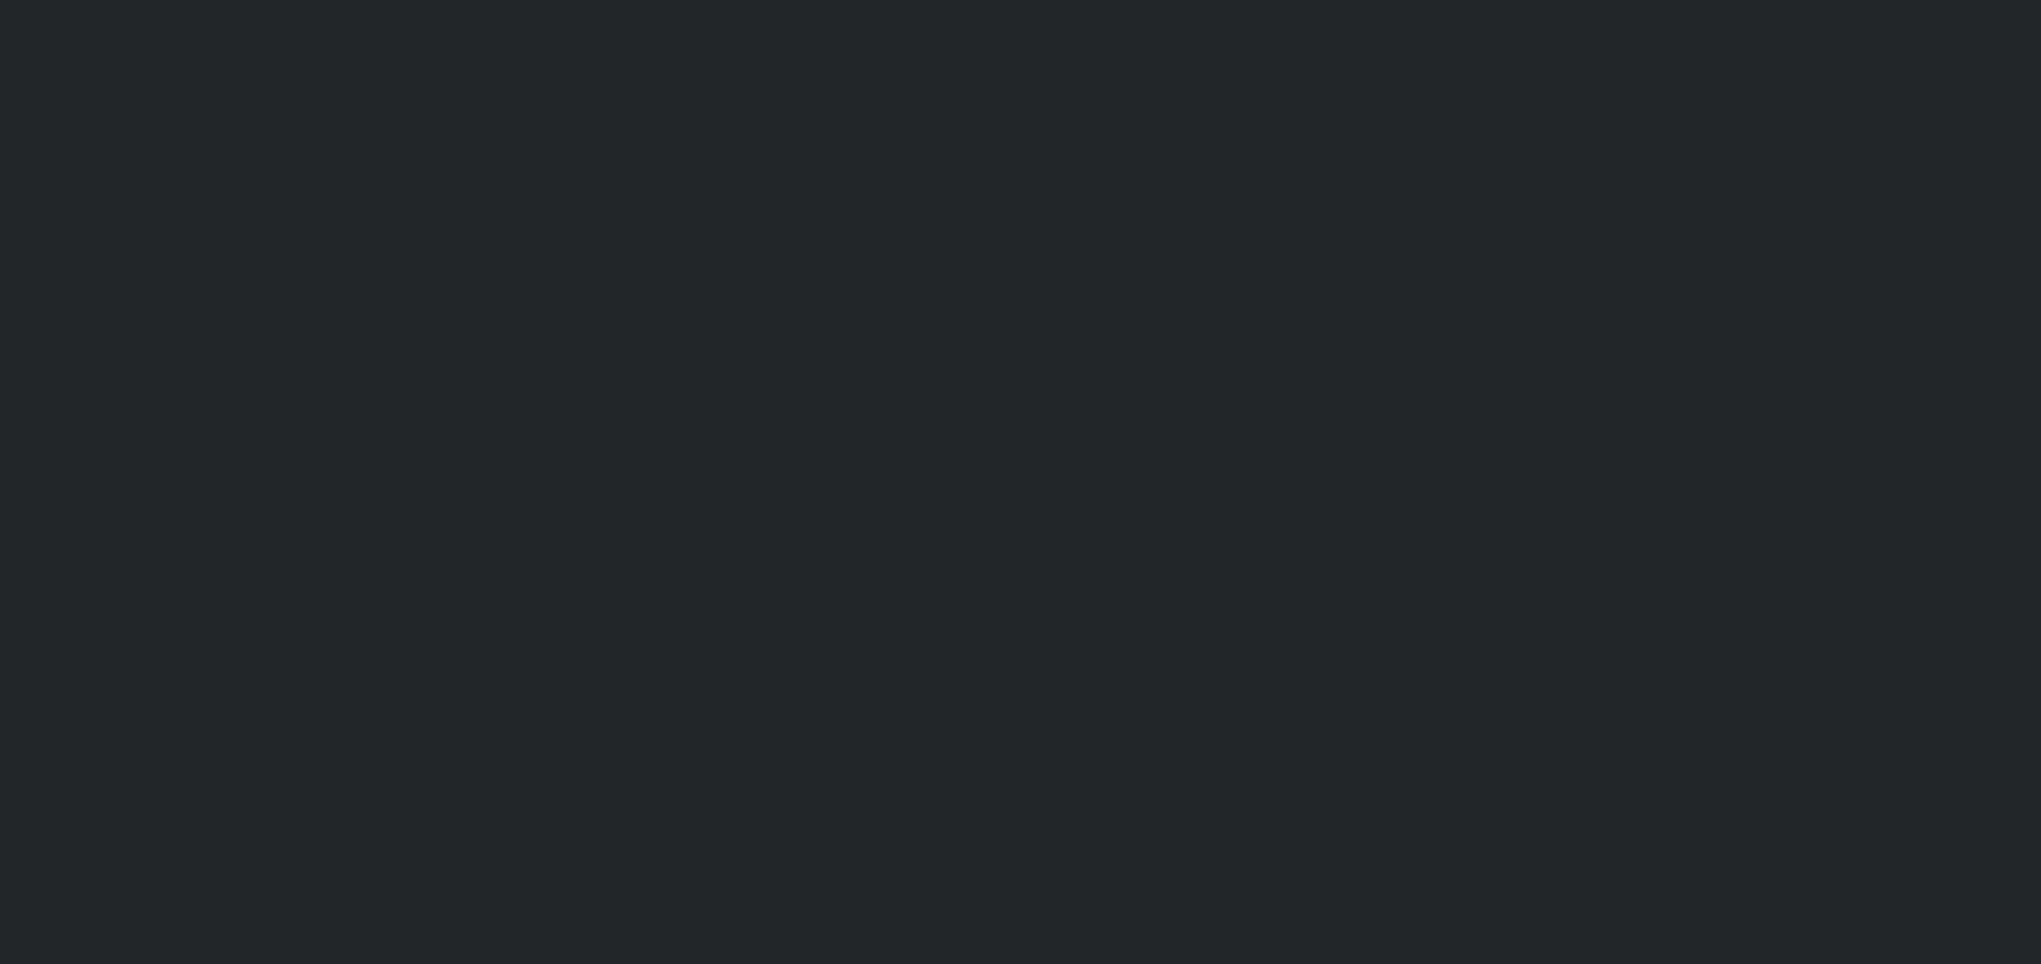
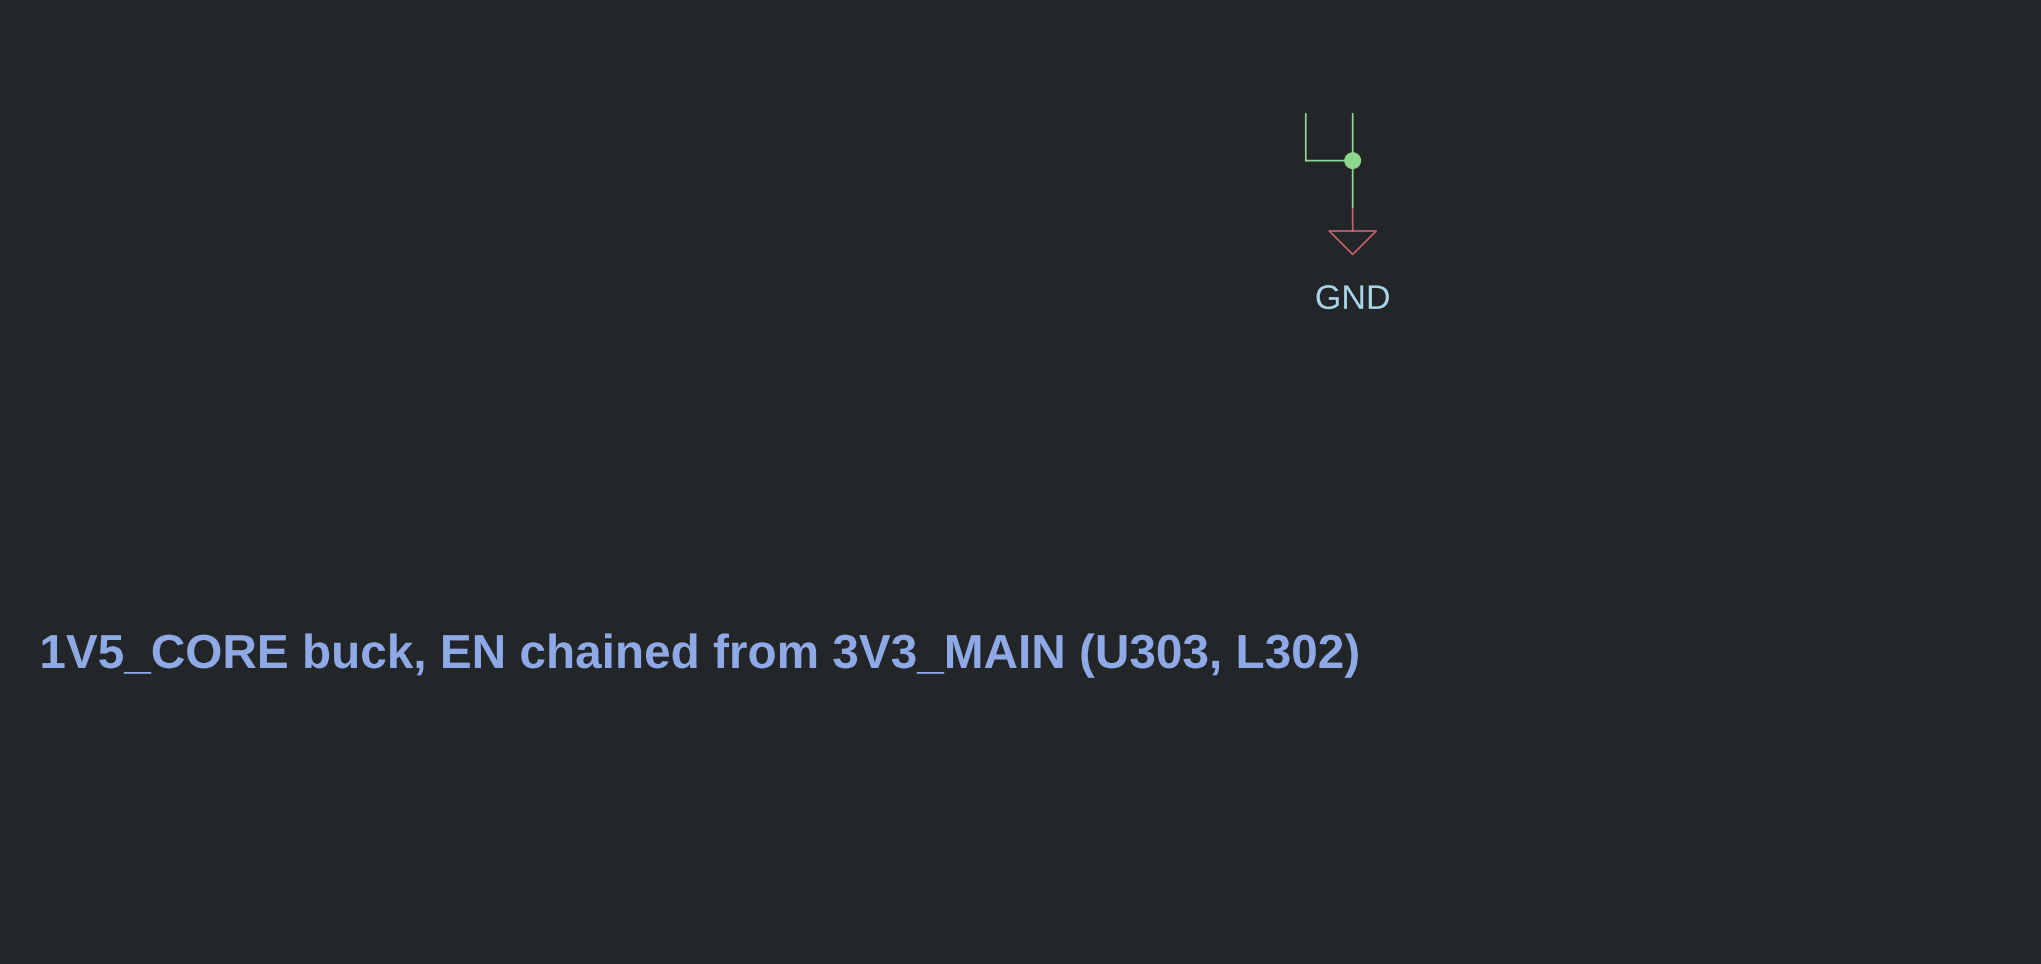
wire: none -> (1305, 113) (1305, 160) (1352, 160)
wire: none -> (1352, 113) (1352, 207)
junction: none -> (1352, 160)
power symbol: none -> GND (1352, 230)
text: none -> 1V5_CORE buck, EN chained from 3V3_MAIN (U303, L302) (700, 655)

